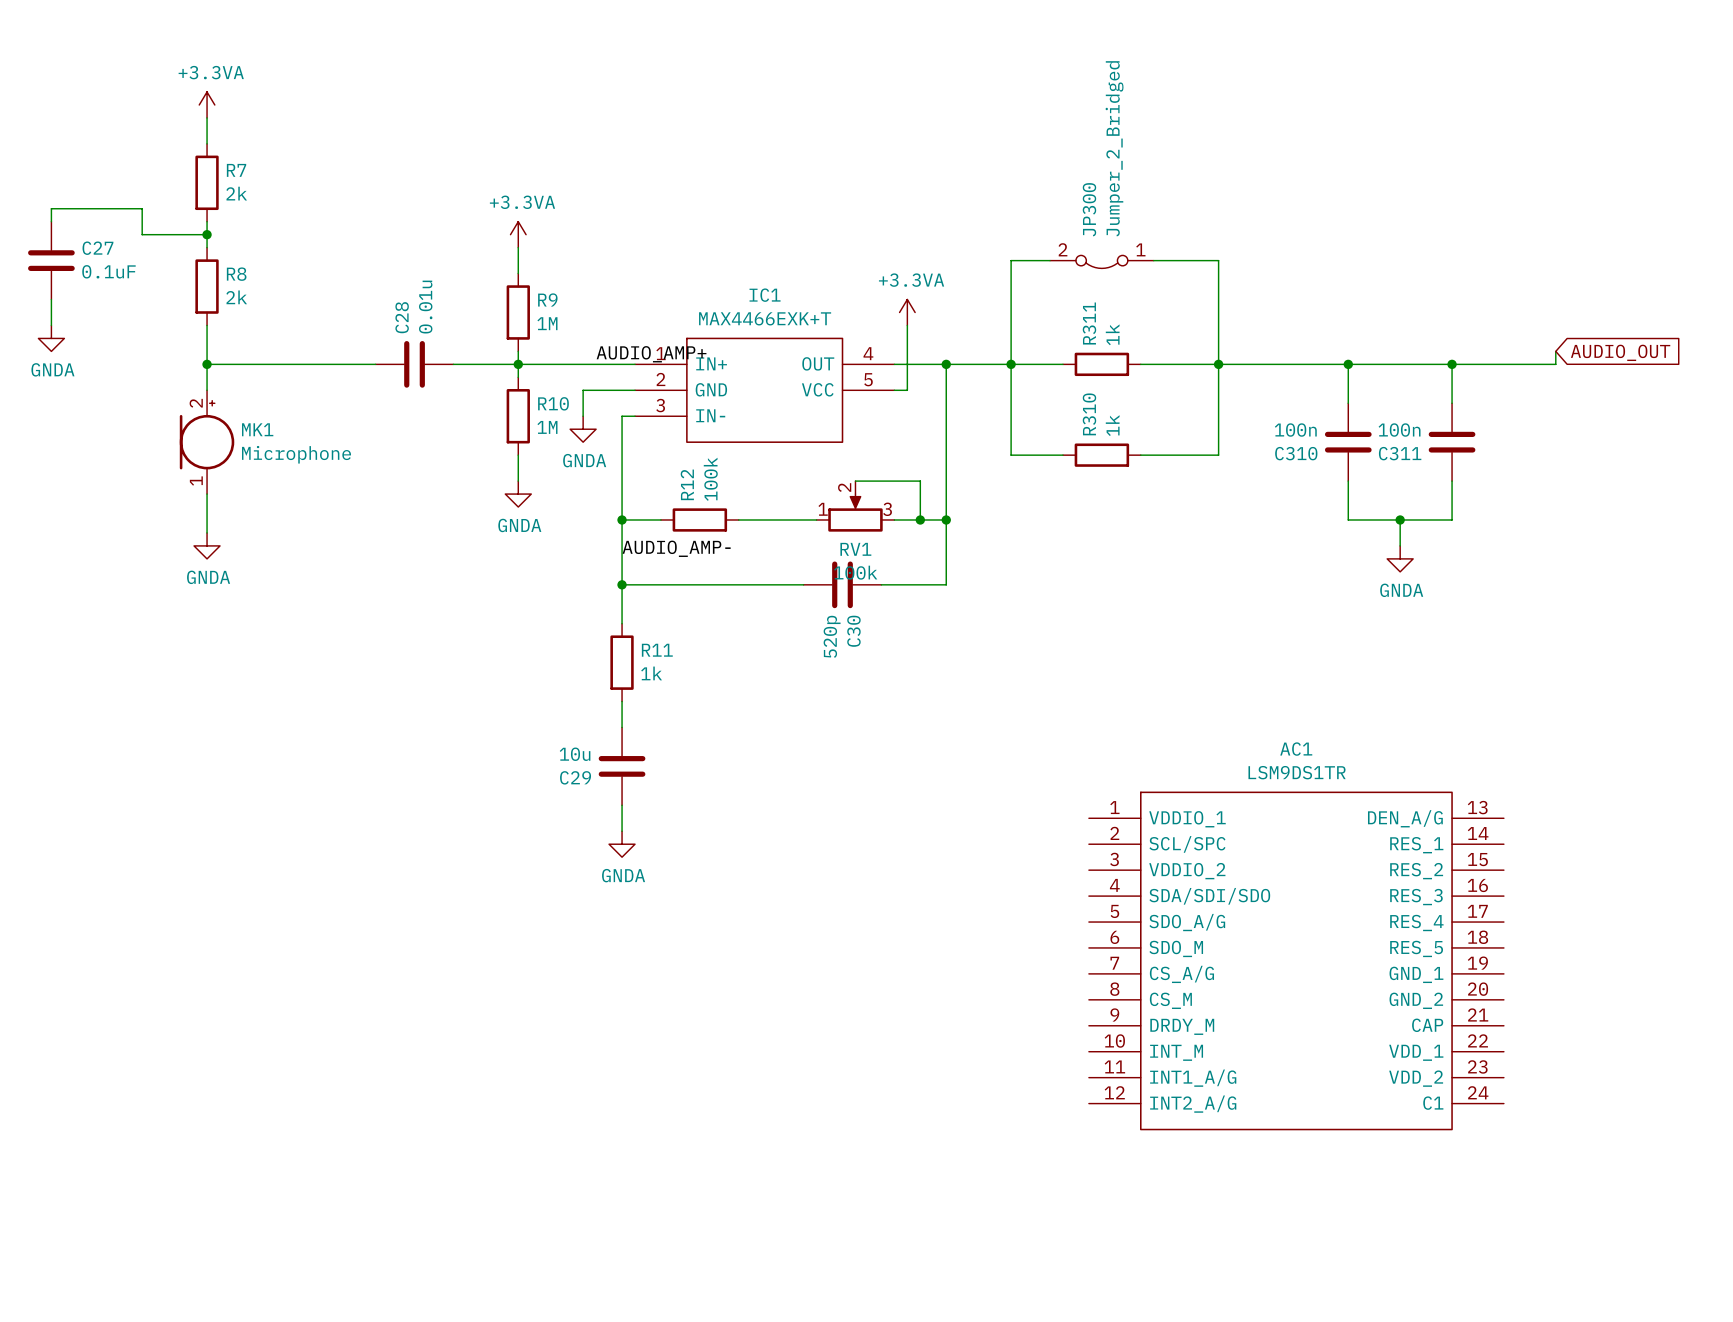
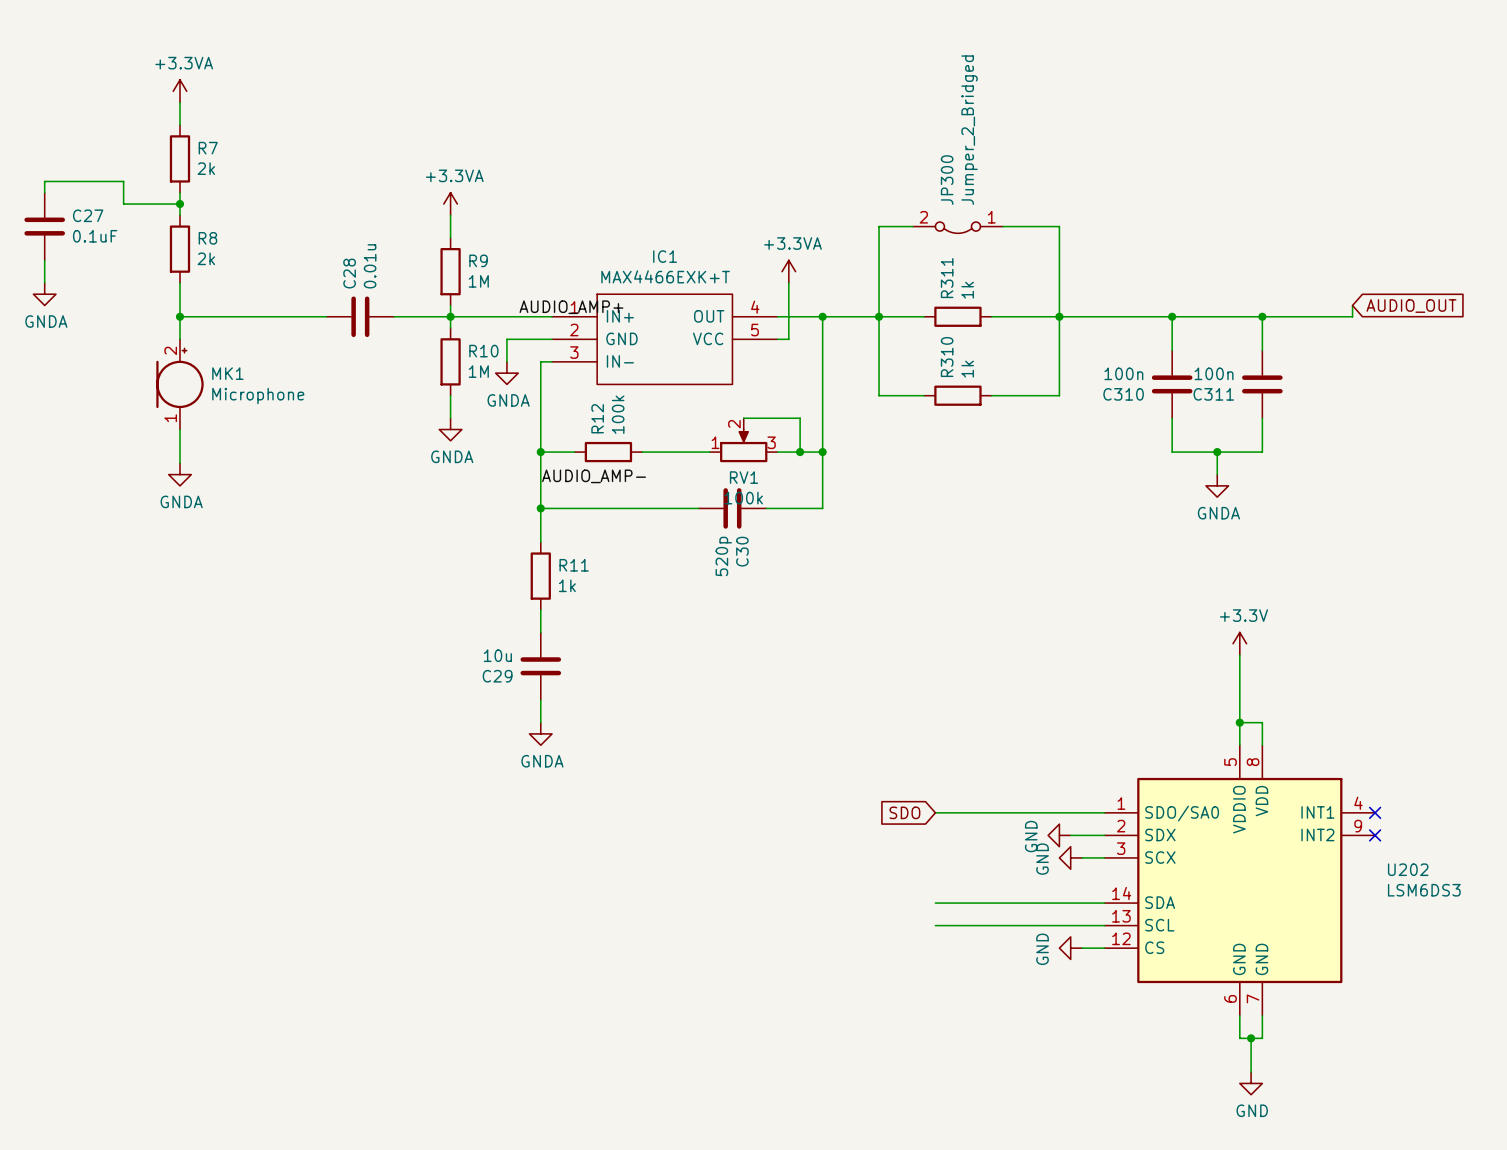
power symbol: none -> +3.3V (1239, 643)
wire: none -> (1239, 655) (1239, 745)
wire: none -> (1239, 722) (1262, 722) (1262, 745)
junction: none -> (1239, 722)
global label: none -> SDO (904, 812)
wire: none -> (935, 812) (1104, 812)
no-connect mark: none -> (1375, 812)
power symbol: none -> GND (1059, 835)
wire: none -> (1070, 835) (1104, 835)
AC1: LSM9DS1TR (1296, 960) -> none
no-connect mark: none -> (1375, 835)
power symbol: none -> GND (1070, 857)
wire: none -> (1081, 857) (1104, 857)
U202: none -> LSM6DS3 (1239, 880)
wire: none -> (935, 903) (1104, 903)
wire: none -> (935, 925) (1104, 925)
power symbol: none -> GND (1070, 948)
wire: none -> (1081, 948) (1104, 948)
wire: none -> (1239, 1015) (1239, 1038) (1262, 1038) (1262, 1015)
wire: none -> (1251, 1038) (1251, 1072)
junction: none -> (1251, 1038)
power symbol: none -> GND (1251, 1083)

